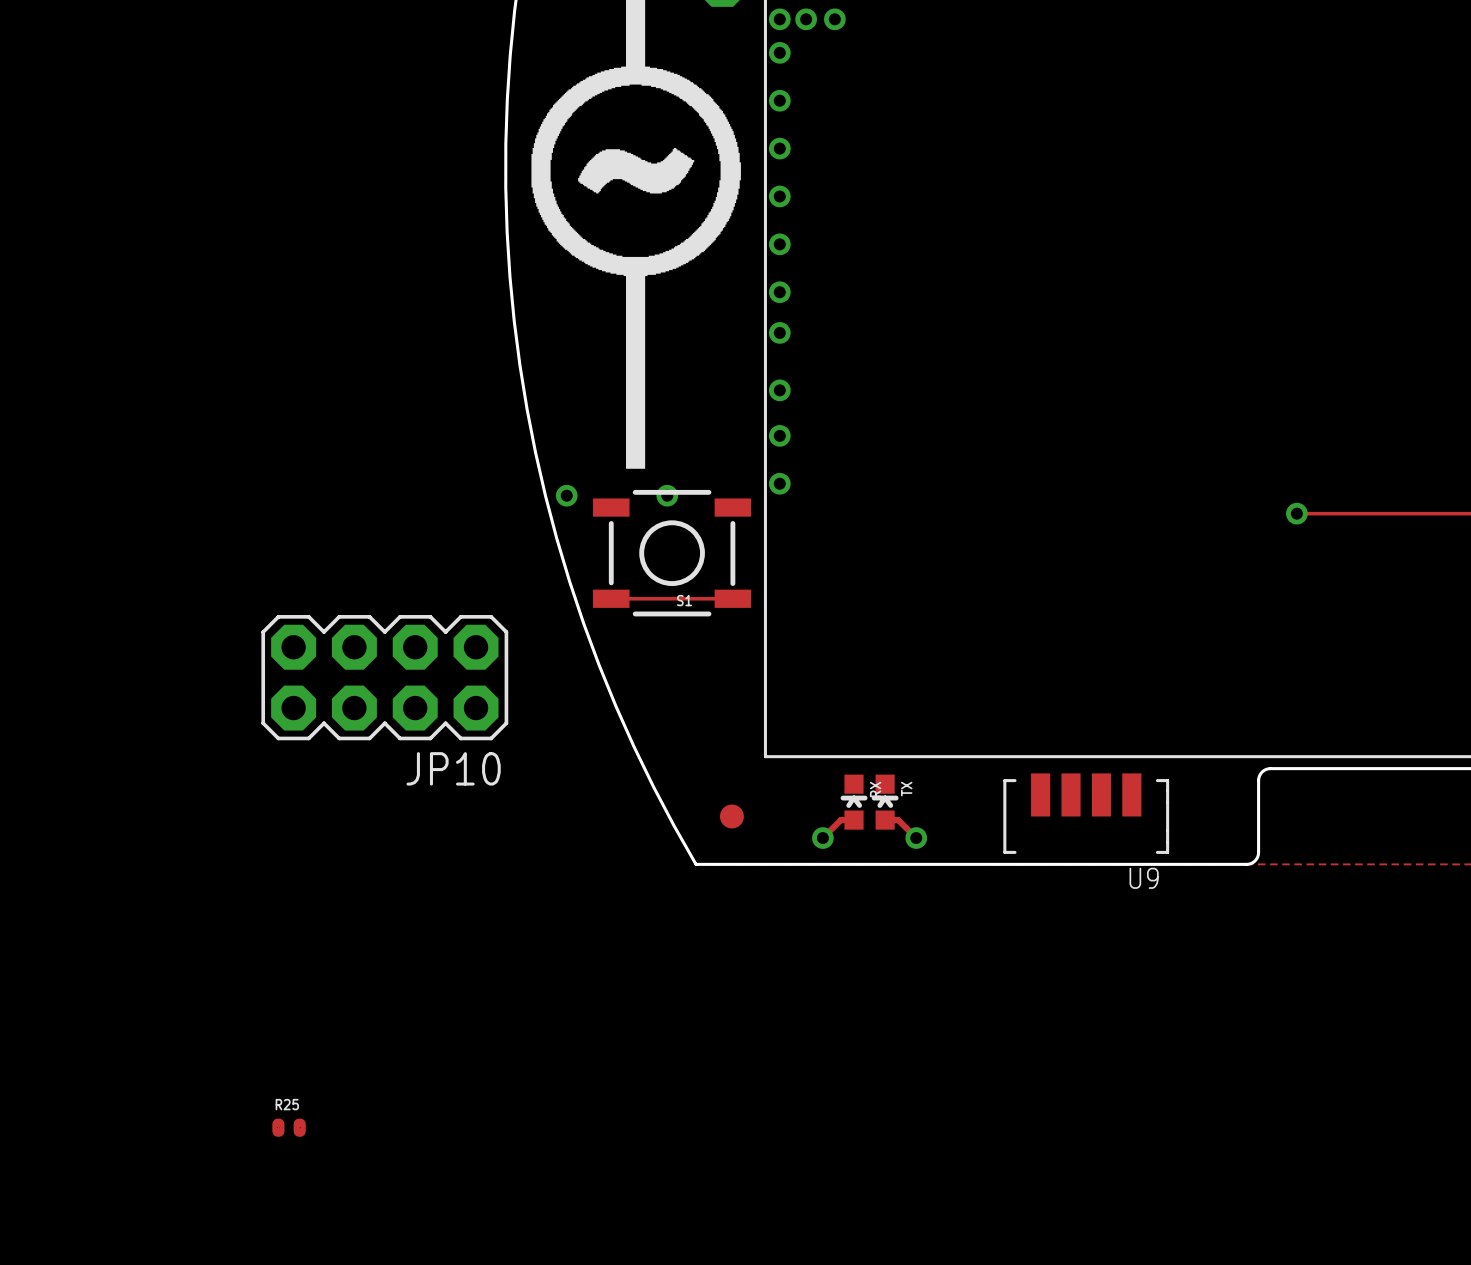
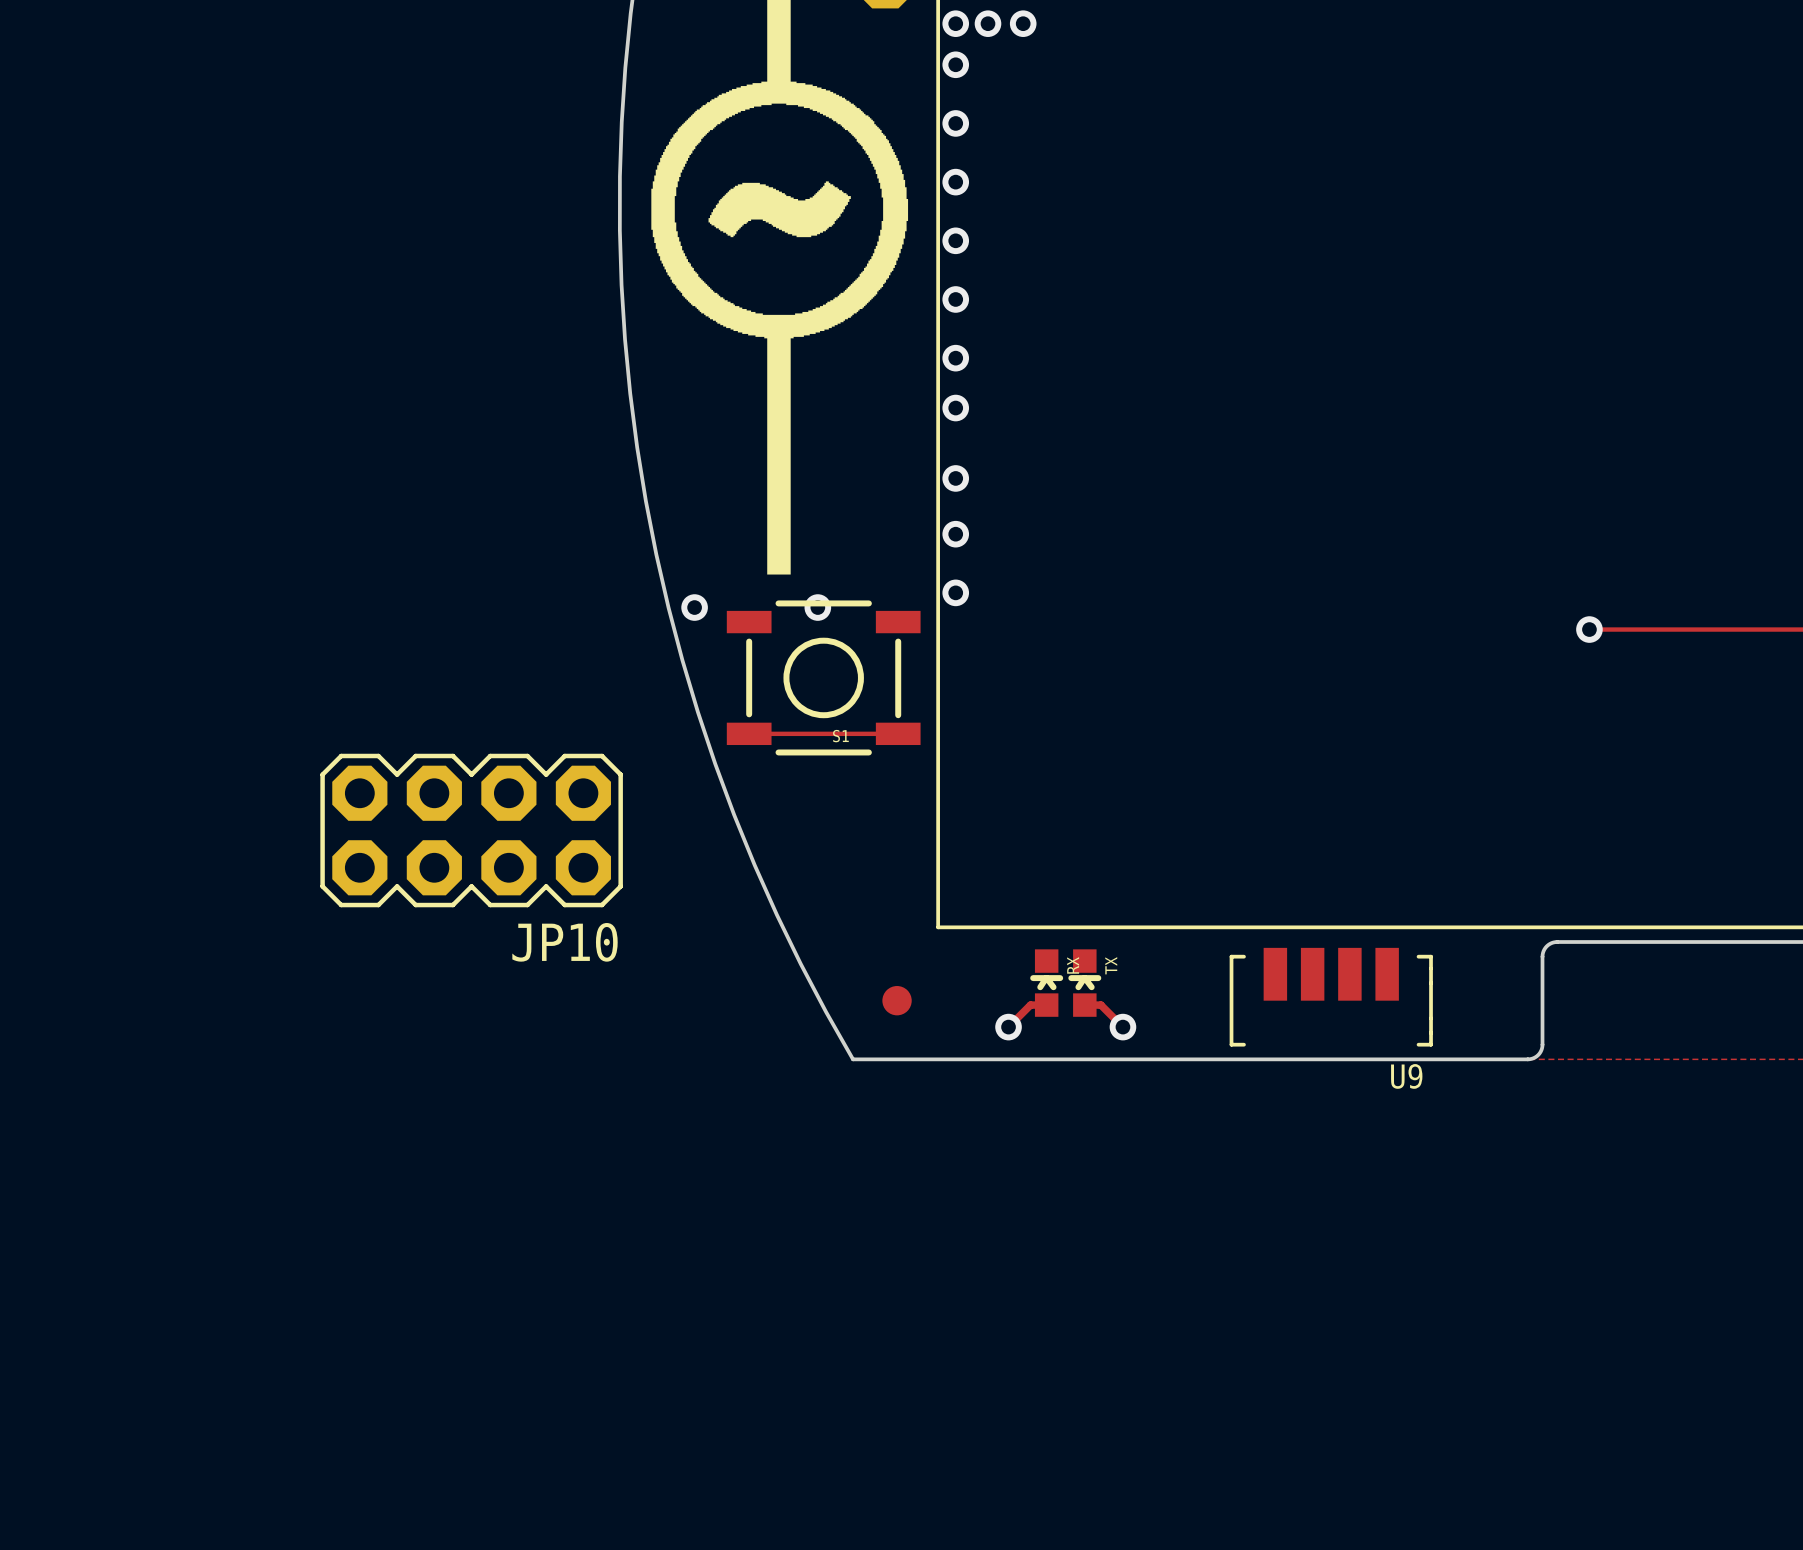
R25: (289, 1127) -> none

